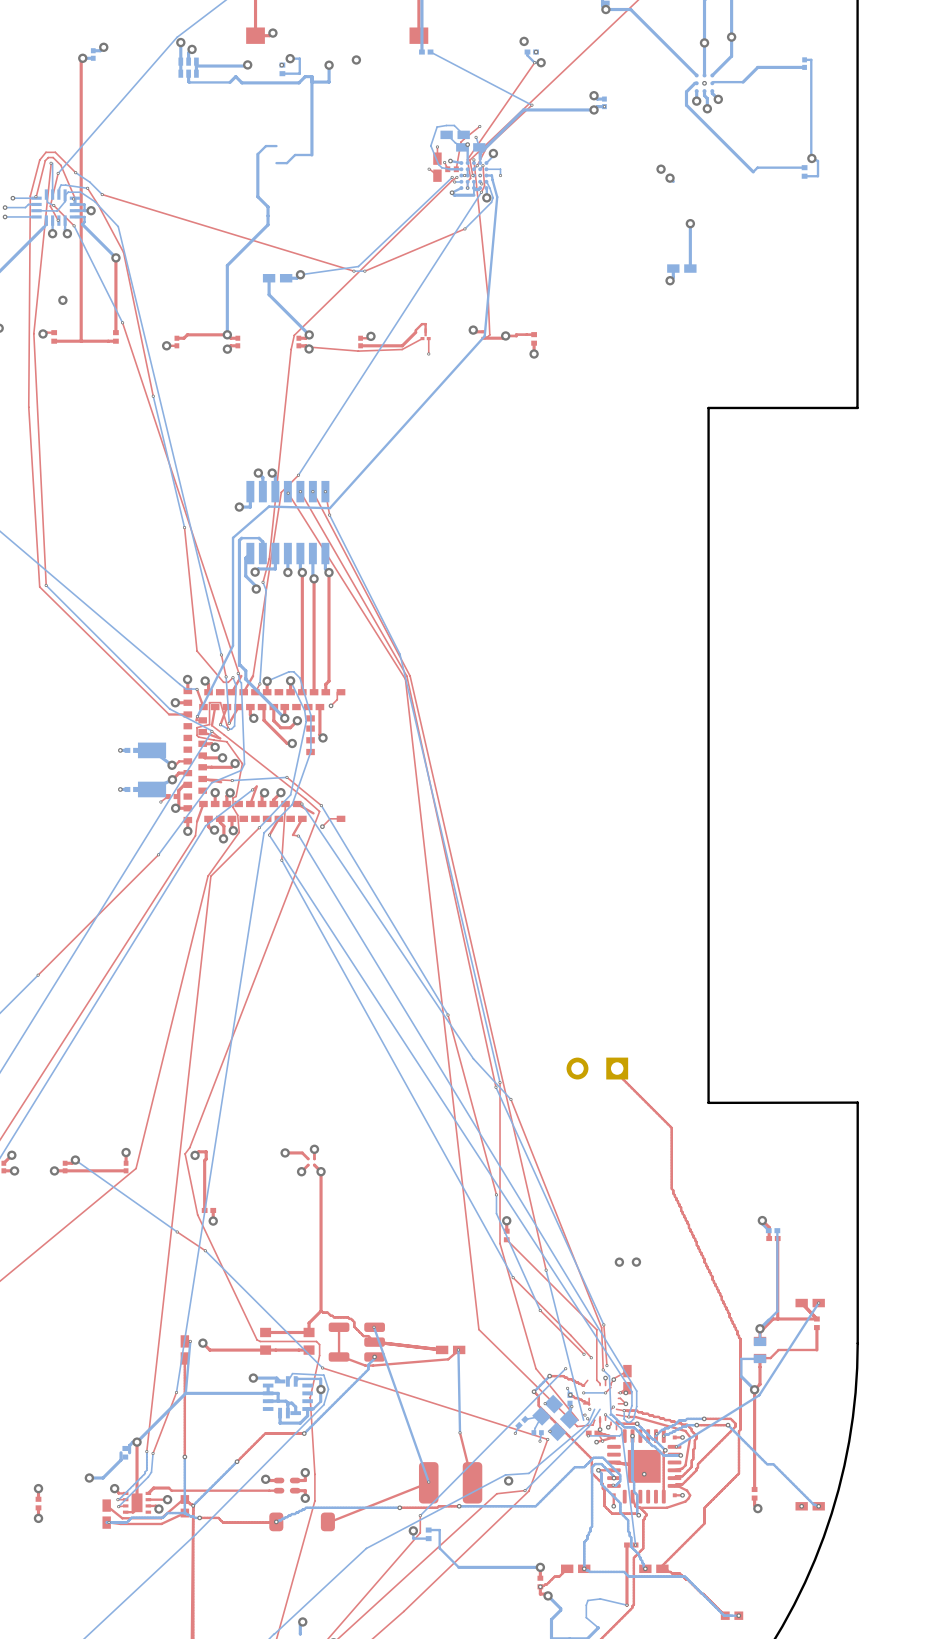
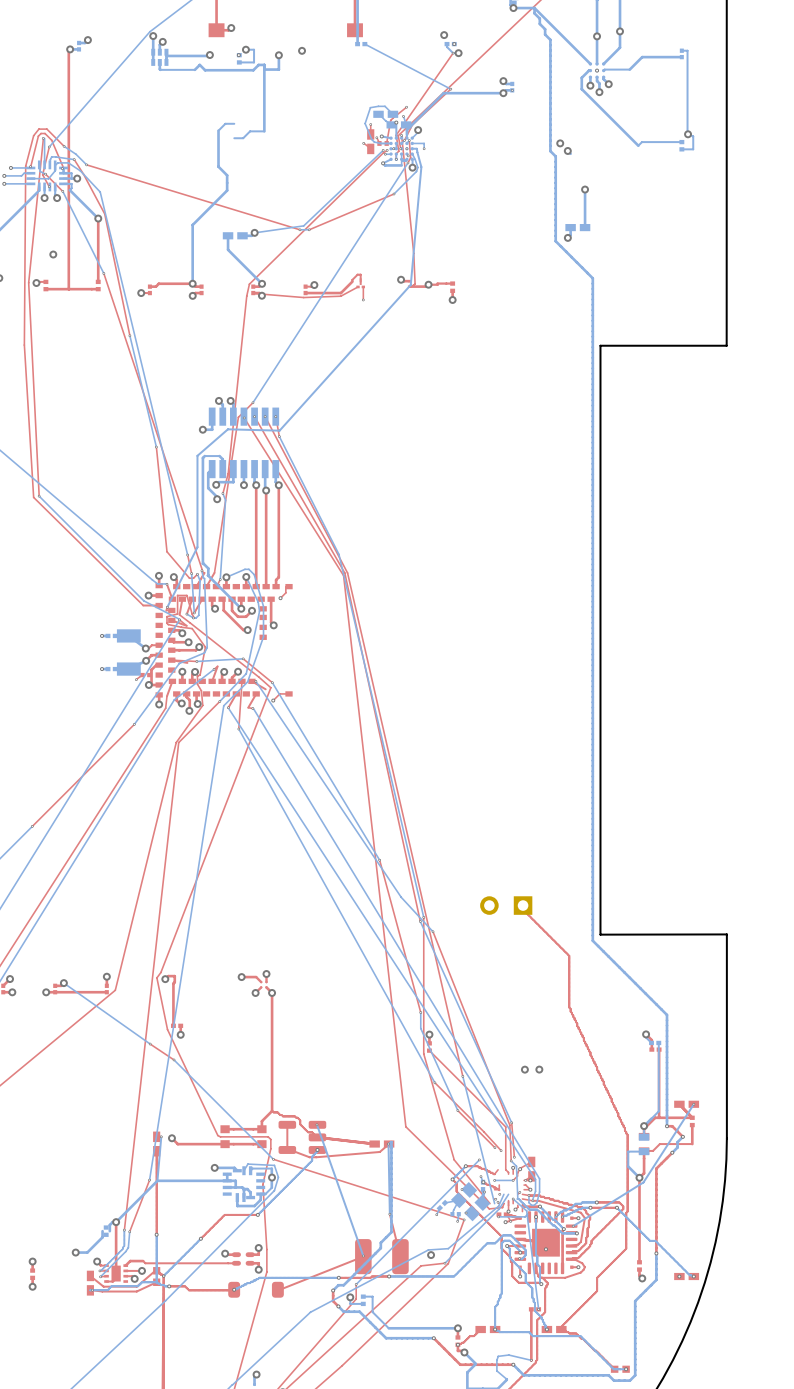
bottom track: none -> (534, 8) (534, 13) (539, 18) (539, 23) (545, 29) (545, 34) (550, 39) (550, 151) (555, 156) (555, 241) (592, 278) (592, 940) (667, 1014) (667, 1126)
top track: none -> (667, 1126) (672, 1126) (682, 1136)
via: none -> (667, 1126)
bottom track: none -> (682, 1136) (672, 1152)
via: none -> (682, 1136)
bottom track: none -> (389, 1144) (391, 1142) (391, 1232) (380, 1242) (380, 1248) (343, 1285) (338, 1285) (333, 1290)
top track: none -> (672, 1152) (656, 1168) (656, 1253)
via: none -> (672, 1152)
bottom track: none -> (656, 1253) (656, 1279) (635, 1301) (635, 1375) (629, 1380) (614, 1380) (608, 1375) (523, 1375) (513, 1364)
via: none -> (656, 1253)
top track: none -> (333, 1290) (333, 1301) (338, 1306)
via: none -> (333, 1290)
bottom track: none -> (338, 1306) (343, 1311) (359, 1311) (386, 1338) (433, 1338)
via: none -> (338, 1306)
top track: none -> (433, 1338) (460, 1364) (513, 1364)
via: none -> (433, 1338)
via: none -> (513, 1364)

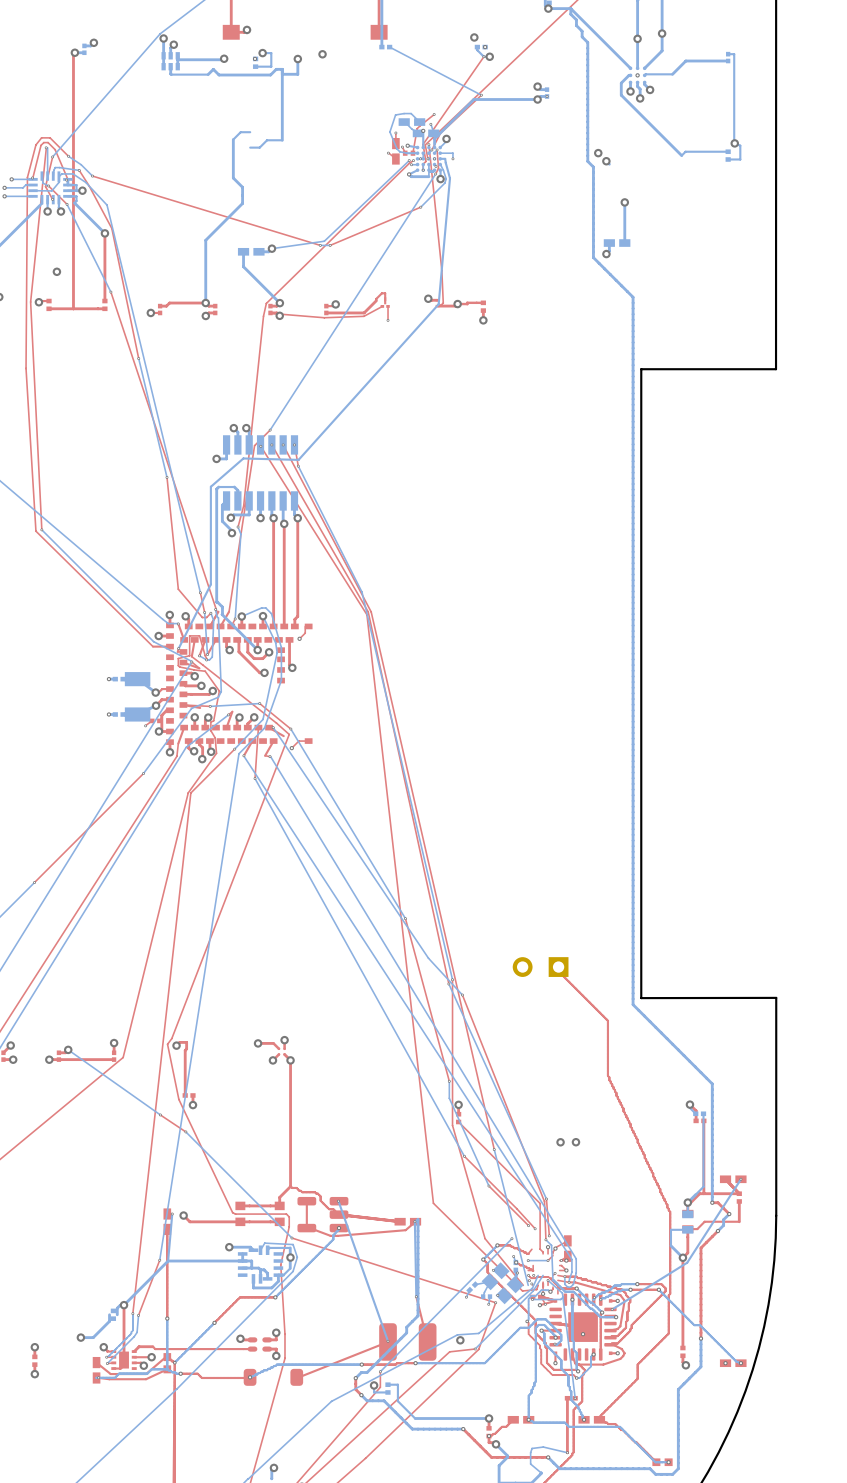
top track: none -> (528, 1275) (531, 1278) (548, 1276) (558, 1287)
via: none -> (528, 1275)
bottom track: none -> (550, 1291) (541, 1290) (535, 1295) (531, 1295) (528, 1298) (527, 1321)
top track: none -> (527, 1321) (528, 1334) (539, 1345) (541, 1349) (541, 1363) (552, 1375) (573, 1375) (576, 1378)
via: none -> (527, 1321)
bottom track: none -> (593, 1354) (590, 1356) (590, 1366) (579, 1378) (576, 1378)
via: none -> (593, 1354)
via: none -> (576, 1378)

